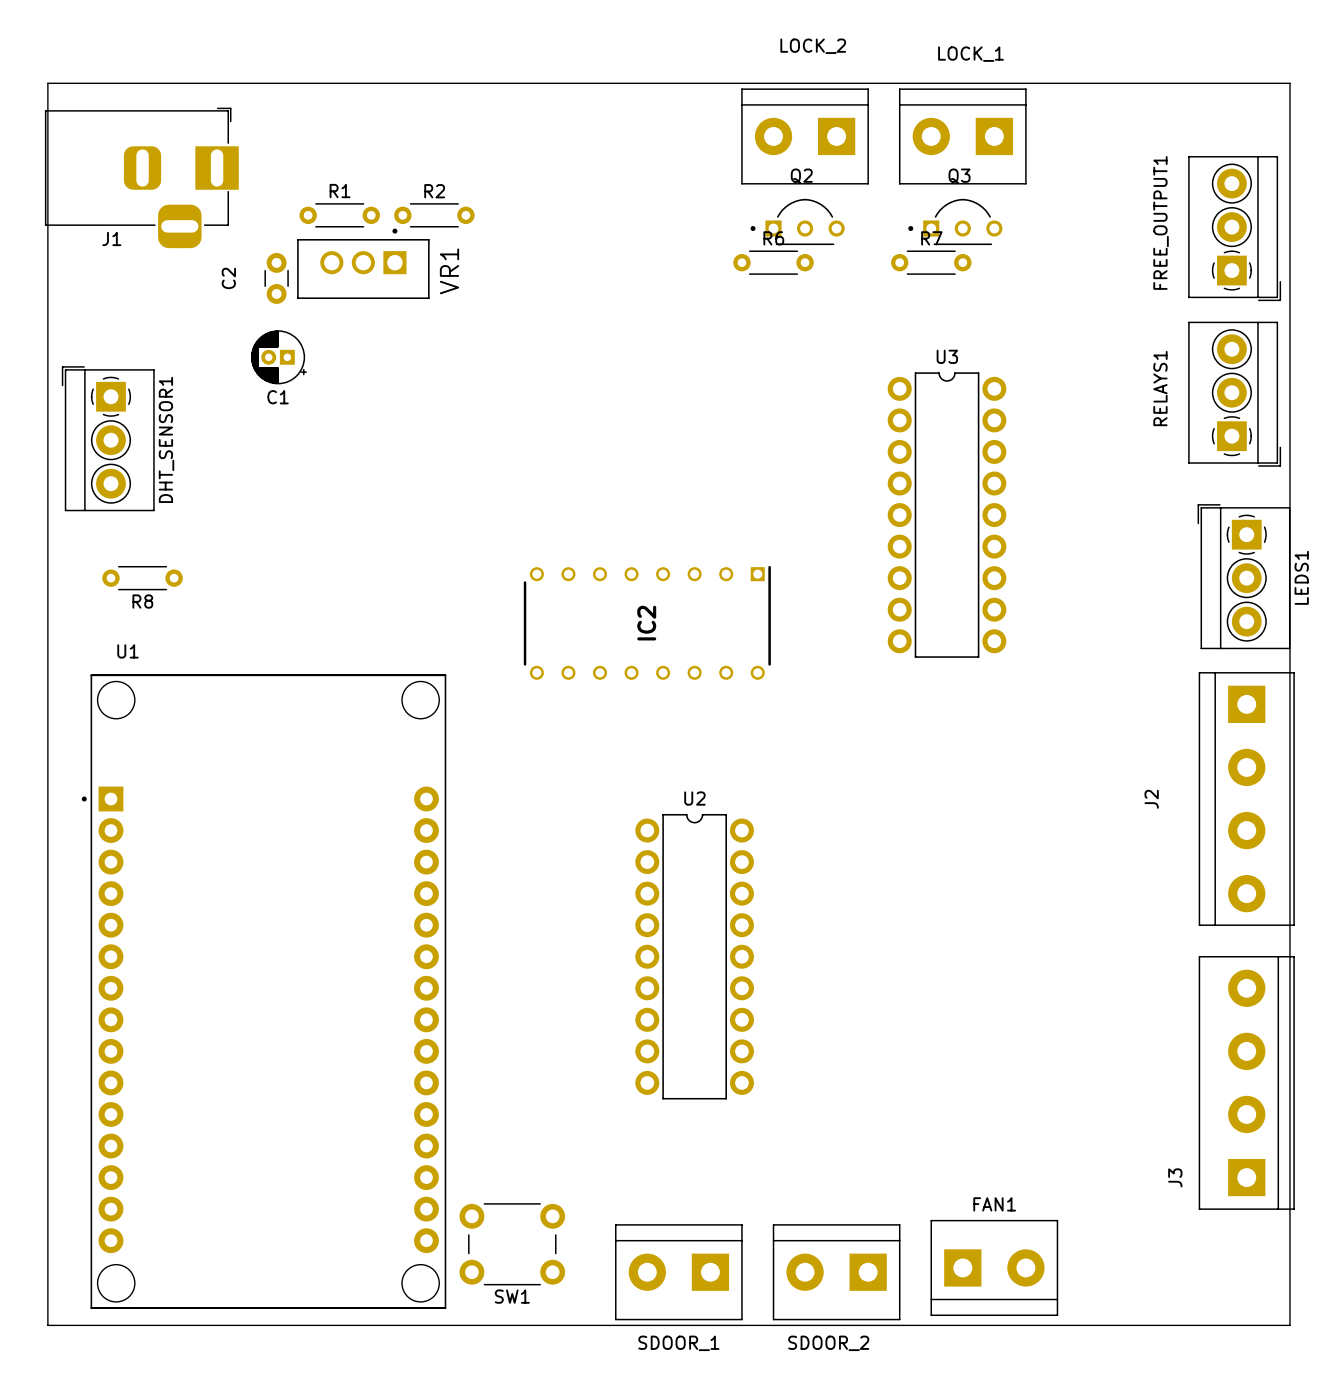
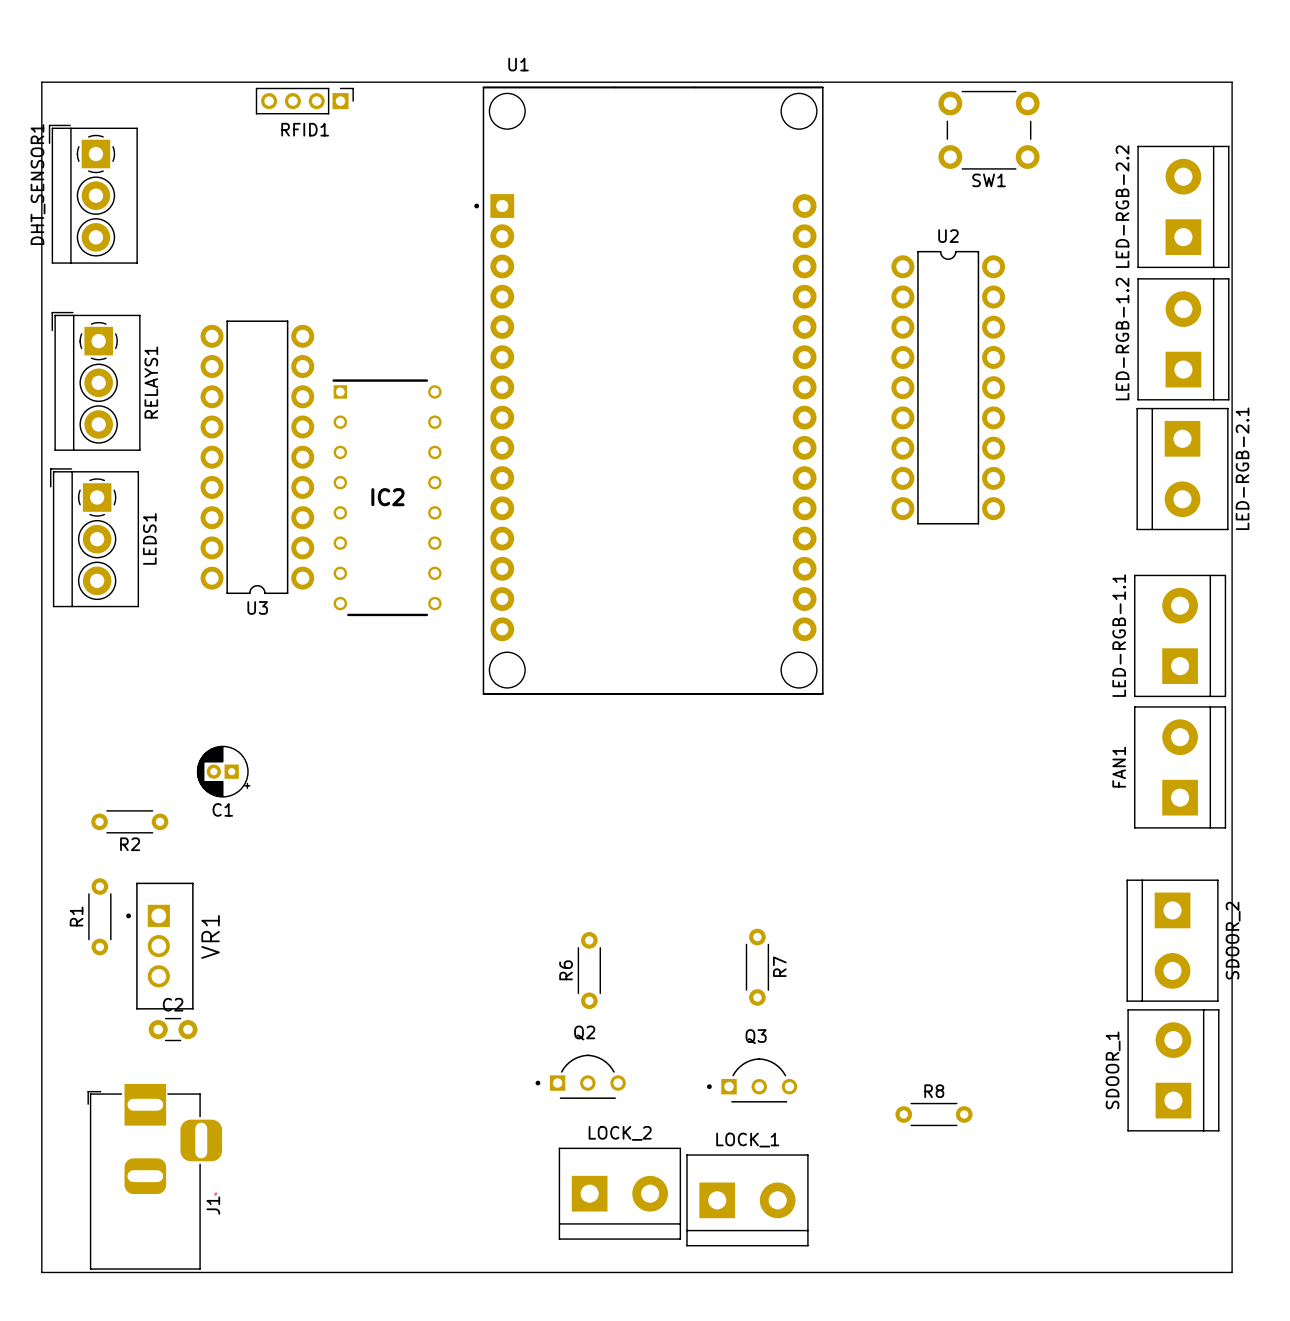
LOCK_2 name position: LOCK_2 (813, 46) -> LOCK_2 (620, 1133)
RFID1: none -> (304, 101)
LOCK_2 rotation: 0° (805, 136) -> 180° (619, 1193)
LOCK_2 position: (805, 136) -> (619, 1193)
LOCK_1 rotation: 0° (962, 136) -> 180° (747, 1200)
LOCK_1 position: (962, 136) -> (747, 1200)
J1 rotation: 0° (141, 177) -> 90° counterclockwise (154, 1176)
J1 position: (141, 177) -> (154, 1176)
R1 name position: R1 (340, 191) -> R1 (76, 916)
R2 name position: R2 (434, 191) -> R2 (130, 844)
LED-RGB-2.2: none -> (1183, 206)
R1 rotation: 0° (339, 215) -> 90° clockwise (99, 916)
R1 position: (339, 215) -> (99, 916)
R2 position: (434, 215) -> (129, 821)
Q2 position: (797, 221) -> (580, 1076)
Q3 position: (955, 221) -> (752, 1080)
FREE_OUTPUT1: (1234, 228) -> none
R6 name position: R6 (773, 238) -> R6 (566, 970)
R6 rotation: 0° (773, 262) -> 90° clockwise (589, 970)
R6 position: (773, 262) -> (589, 970)
R7 rotation: 0° (931, 262) -> 90° clockwise (757, 967)
R7 position: (931, 262) -> (757, 967)
VR1 rotation: 0° (363, 263) -> 90° counterclockwise (159, 946)
VR1 position: (363, 263) -> (159, 946)
VR1 name position: VR1 (449, 271) -> VR1 (210, 936)
C2 rotation: 0° (276, 278) -> 90° clockwise (173, 1029)
C2 position: (276, 278) -> (173, 1029)
LED-RGB-1.2: none -> (1183, 339)
C1 position: (278, 357) -> (223, 771)
RELAYS1 rotation: 0° (1234, 394) -> 180° (96, 381)
RELAYS1 position: (1234, 394) -> (96, 381)
DHT_SENSOR1 position: (108, 438) -> (93, 194)
DHT_SENSOR1 name position: DHT_SENSOR1 (166, 439) -> DHT_SENSOR1 (38, 184)
LED-RGB-2.1: none -> (1182, 469)
U3 rotation: 0° (947, 515) -> 180° (257, 457)
U3 position: (947, 515) -> (257, 457)
LEDS1 position: (1244, 576) -> (94, 537)
R8 position: (142, 578) -> (933, 1114)
R8 name position: R8 (142, 601) -> R8 (934, 1091)
IC2 rotation: 0° (647, 622) -> 90° counterclockwise (387, 497)
IC2 position: (647, 622) -> (387, 497)
LED-RGB-1.1: none -> (1180, 635)
J2: (1246, 799) -> none
U2 position: (694, 956) -> (948, 387)
U1 position: (264, 991) -> (648, 390)
J3: (1246, 1082) -> none
track: none -> (216, 1193) (215, 1194)
SW1 position: (512, 1244) -> (989, 130)
FAN1 rotation: 0° (994, 1267) -> 90° counterclockwise (1180, 767)
FAN1 position: (994, 1267) -> (1180, 767)
SDOOR_1 rotation: 0° (678, 1272) -> 90° clockwise (1173, 1070)
SDOOR_1 position: (678, 1272) -> (1173, 1070)
SDOOR_2 rotation: 0° (836, 1272) -> 90° counterclockwise (1172, 940)
SDOOR_2 position: (836, 1272) -> (1172, 940)

